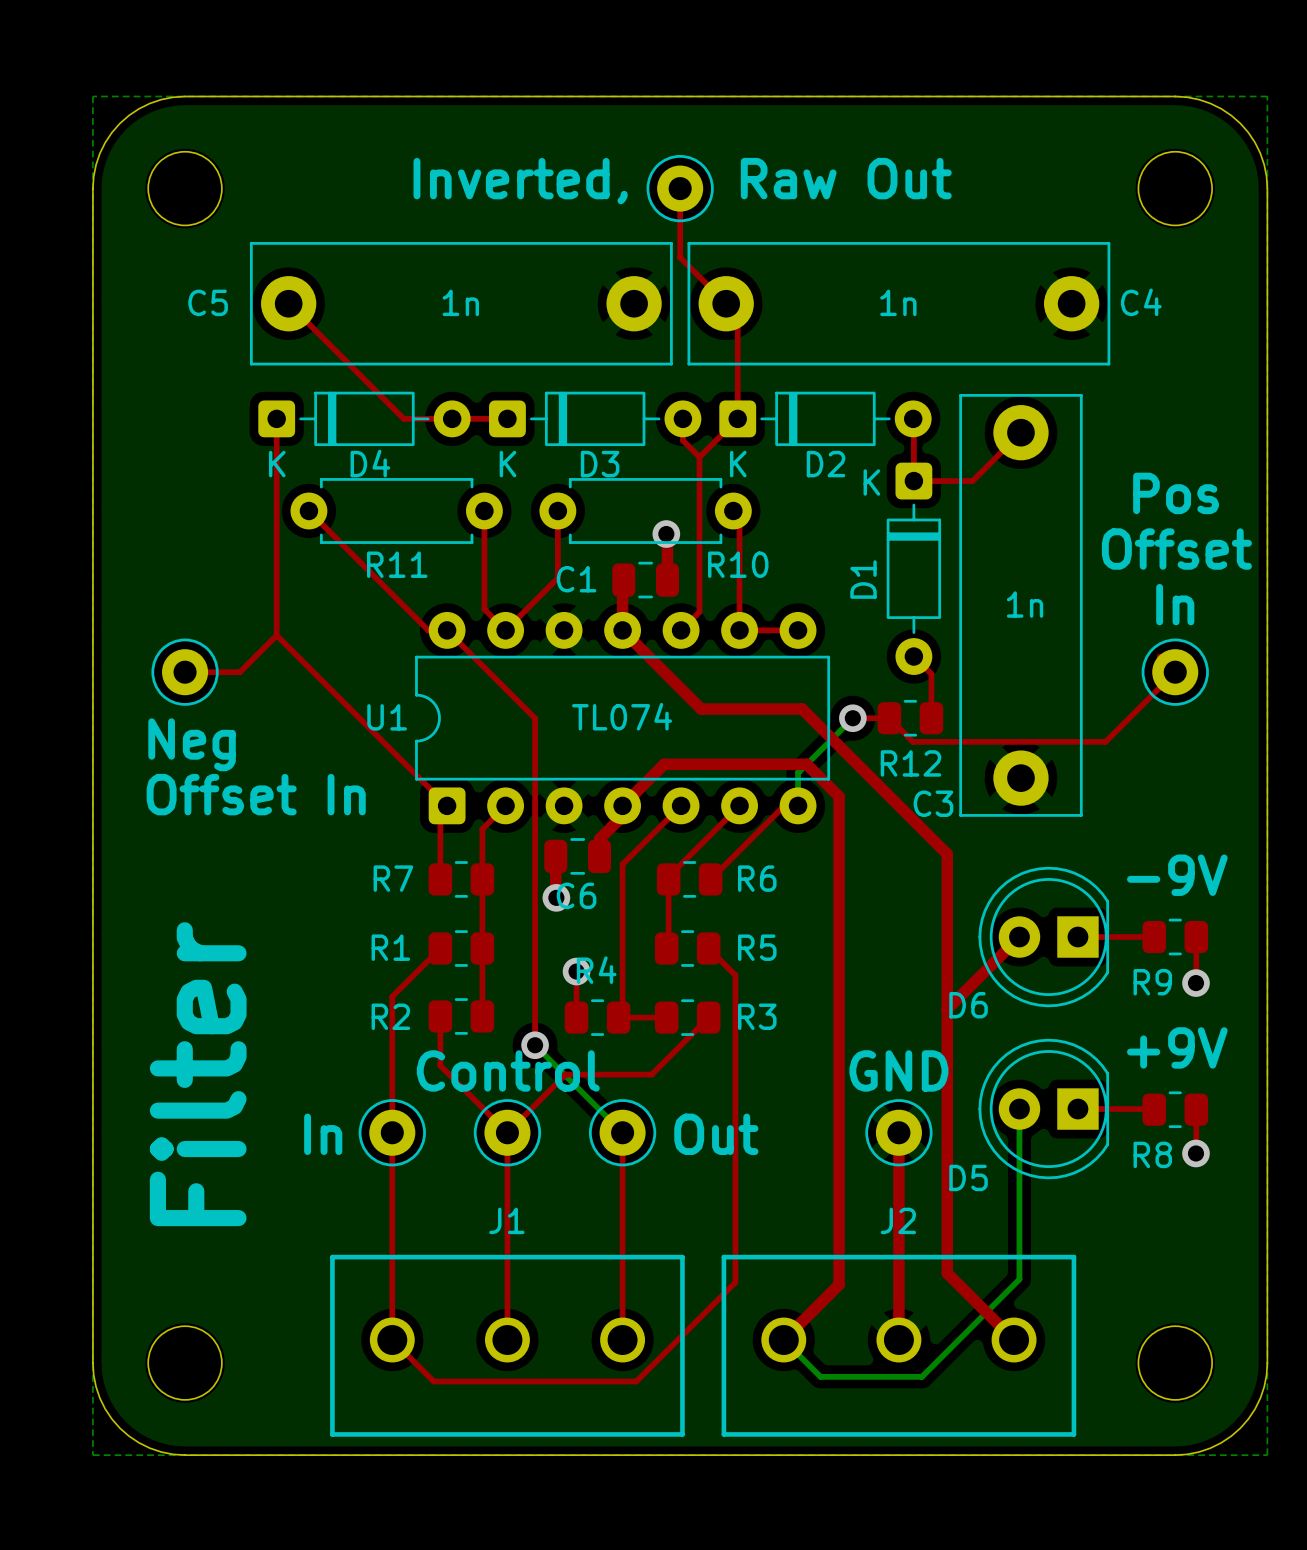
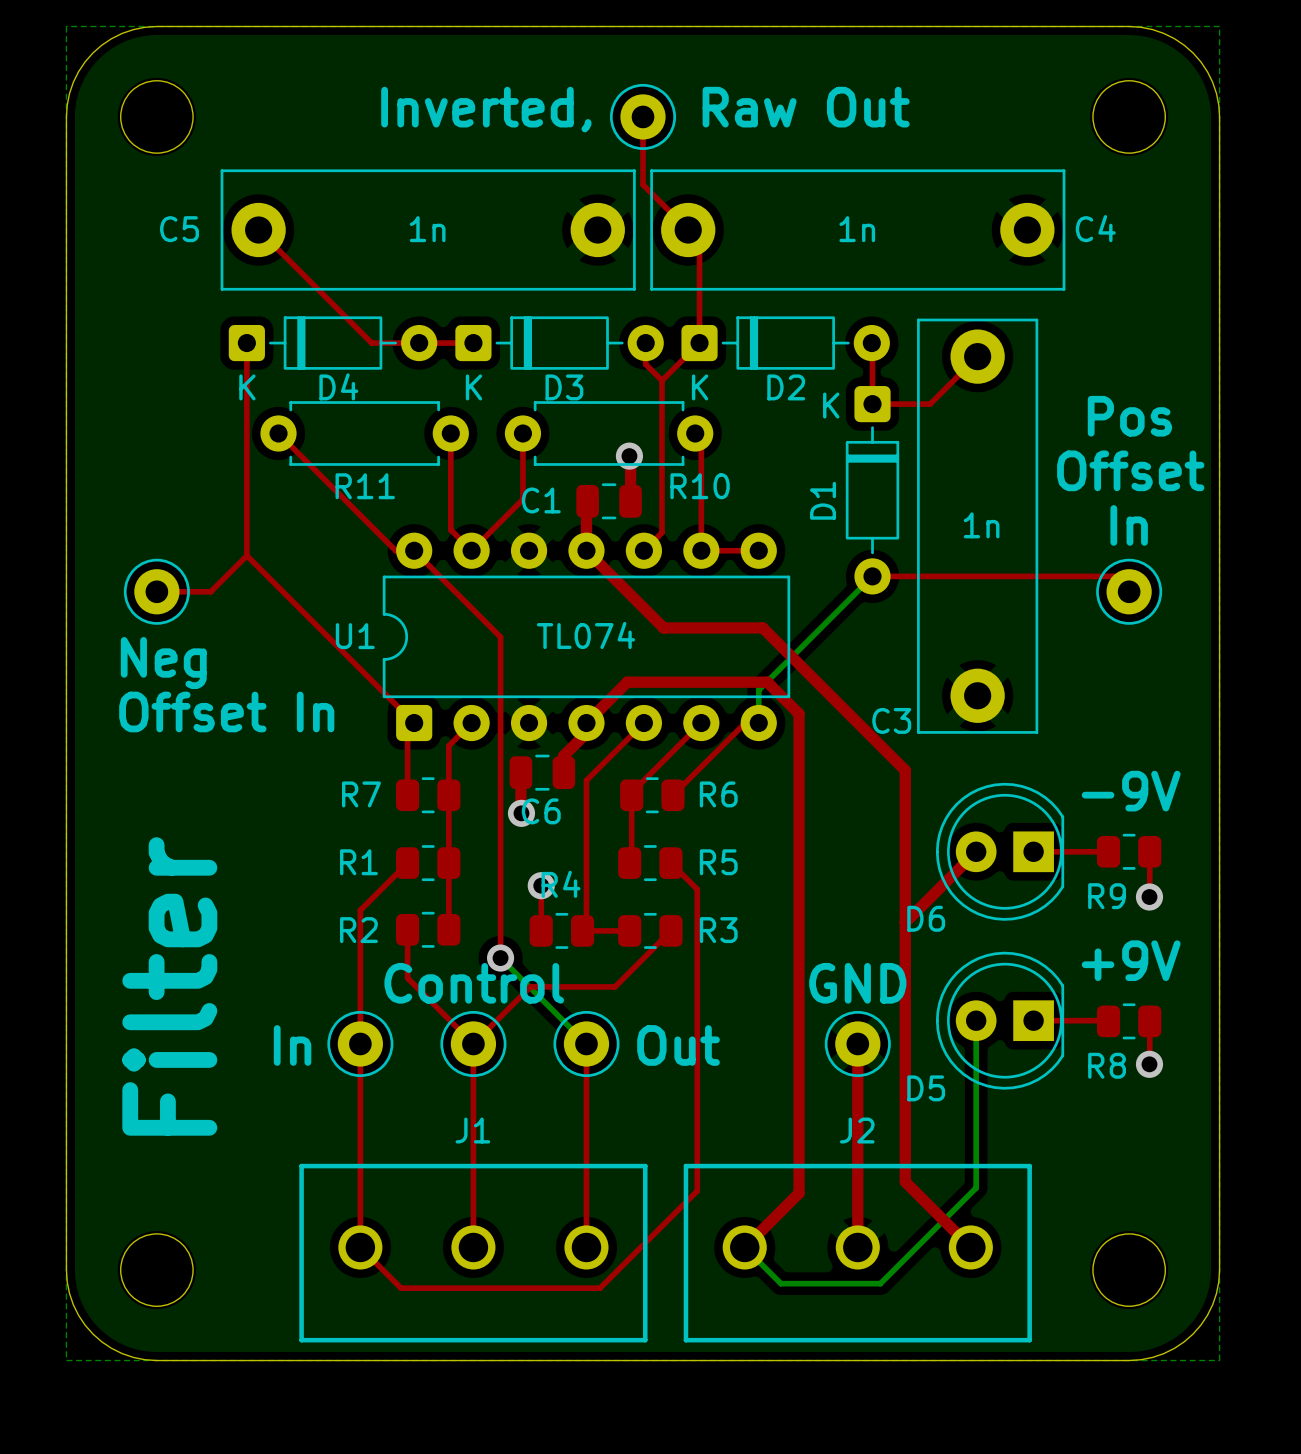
top track: (913, 656) (931, 674) (931, 718) -> (872, 576) (1113, 576)
top track: (1175, 672) (1105, 741) (913, 741) (889, 718) (852, 718) -> none
bottom track: (852, 718) (798, 772) -> (872, 576) (758, 690)
via: (852, 718) -> none
R12: (910, 718) -> none

